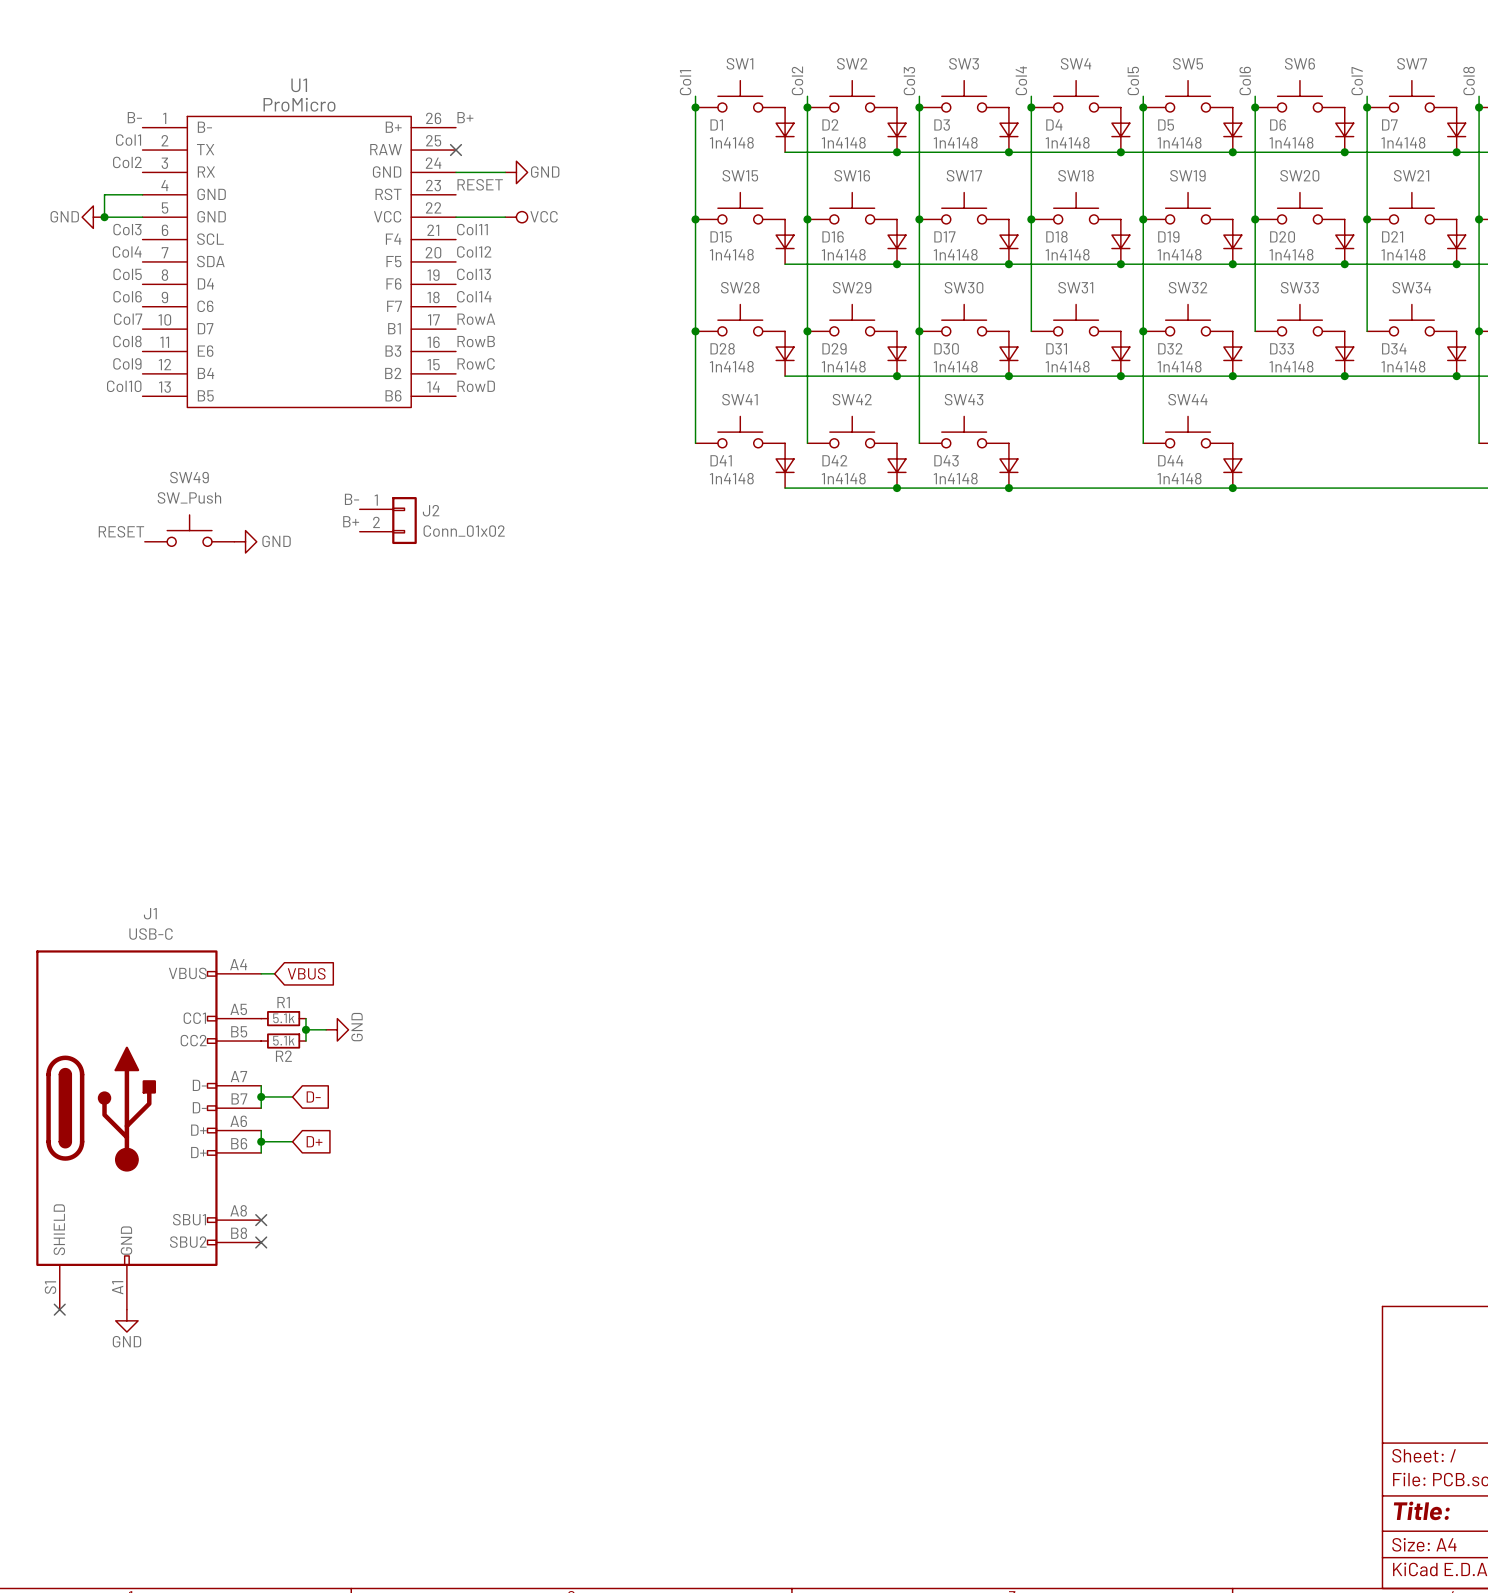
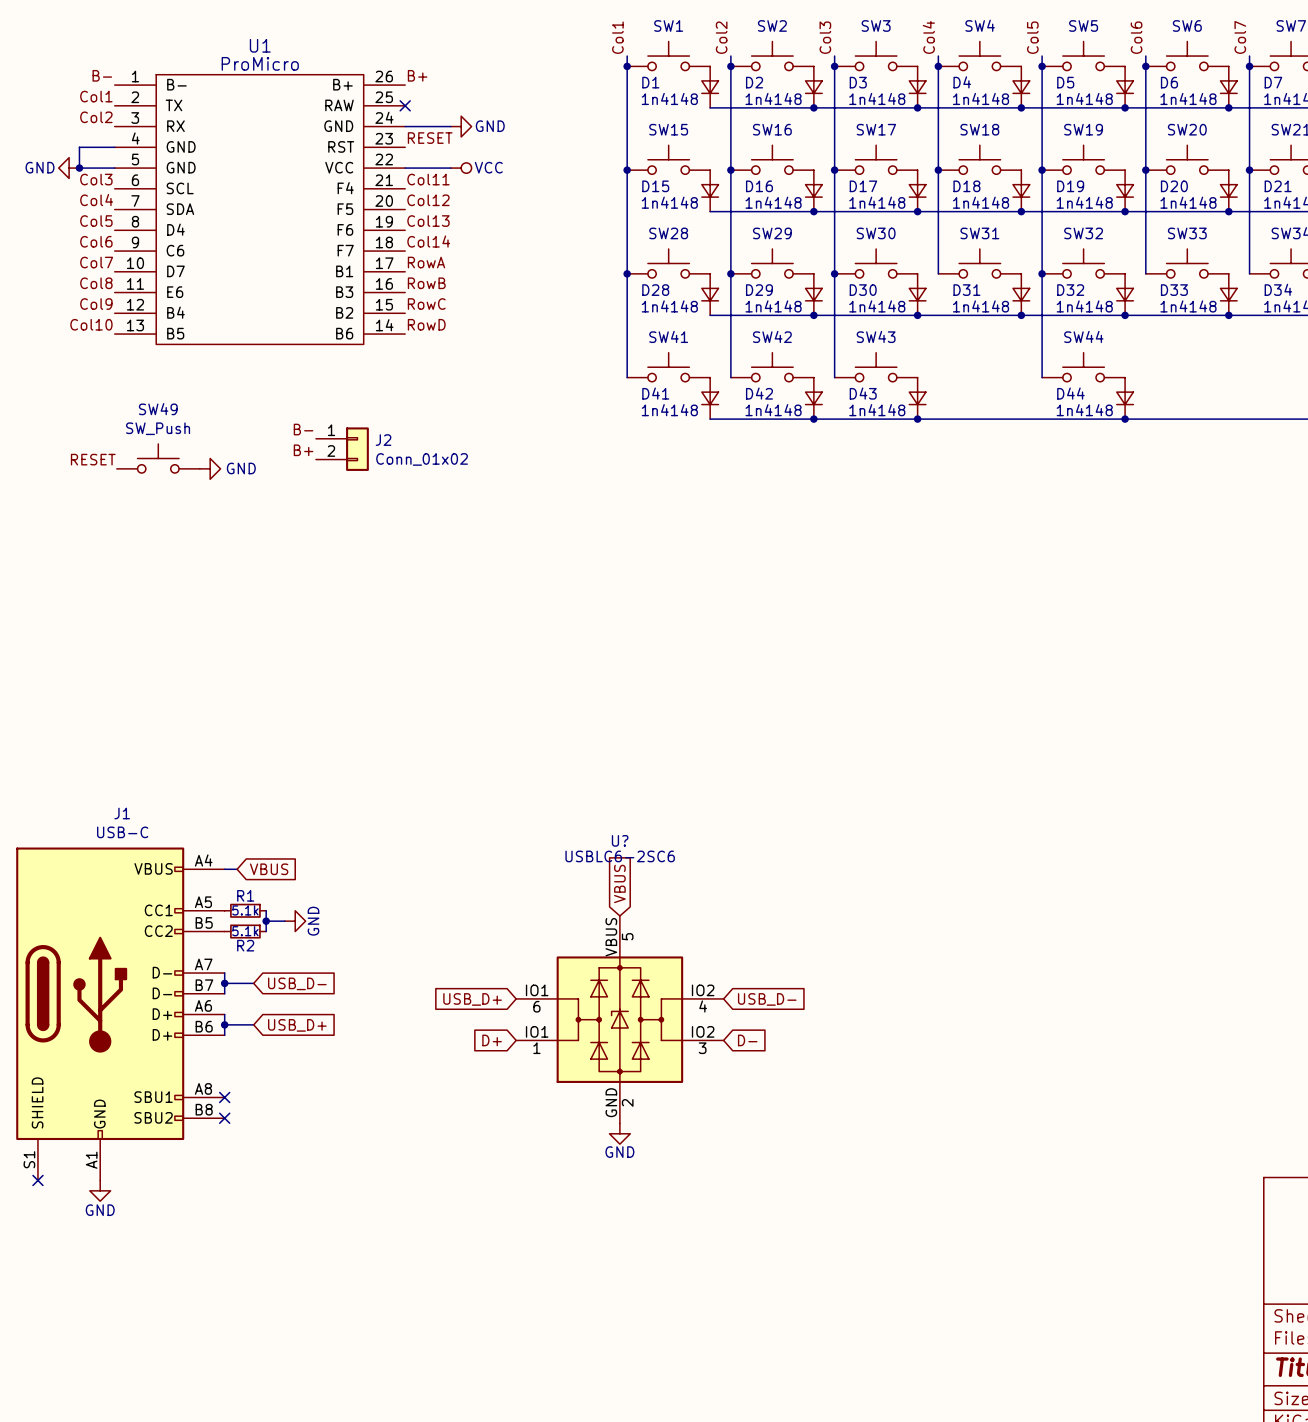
global label: none -> VBUS (619, 883)
global label: D- (313, 1096) -> USB_D- (297, 983)
global label: none -> USB_D+ (472, 999)
global label: none -> USB_D- (767, 999)
U?: none -> USBLC6-2SC6 (619, 1019)
global label: D+ (314, 1141) -> USB_D+ (297, 1025)
global label: none -> D+ (492, 1040)
global label: none -> D- (747, 1040)
power symbol: none -> GND (619, 1133)

